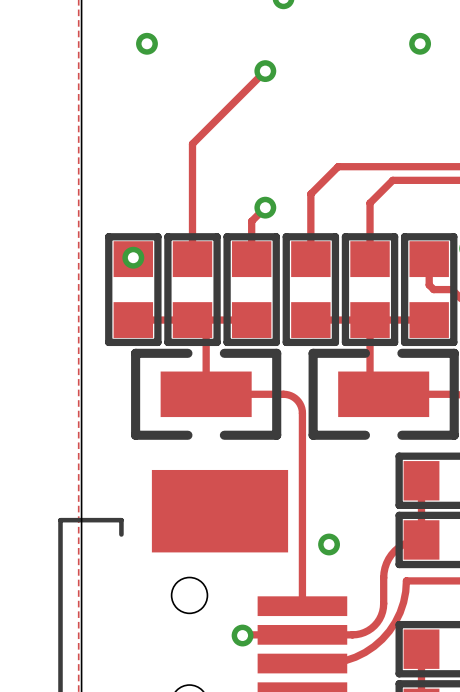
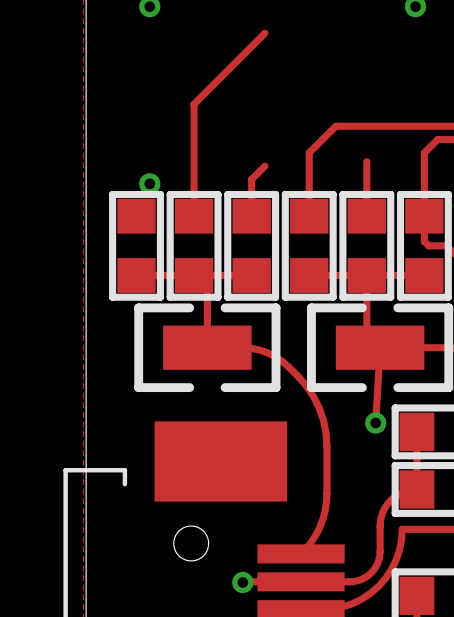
via: (265, 71) -> none
track: (442, 180) (392, 180) (370, 203) -> (437, 139) (424, 152) (424, 216)
via: (265, 207) -> none
via position: (133, 257) -> (149, 183)
track: none -> (366, 334) (380, 347) (375, 423)
track: (242, 394) (288, 394) (296, 399) (301, 408) (302, 606) -> (242, 347) (267, 352) (288, 366) (313, 396) (323, 420) (326, 446) (325, 510) (316, 534) (301, 553)
via: none -> (375, 423)
via: (329, 544) -> none

